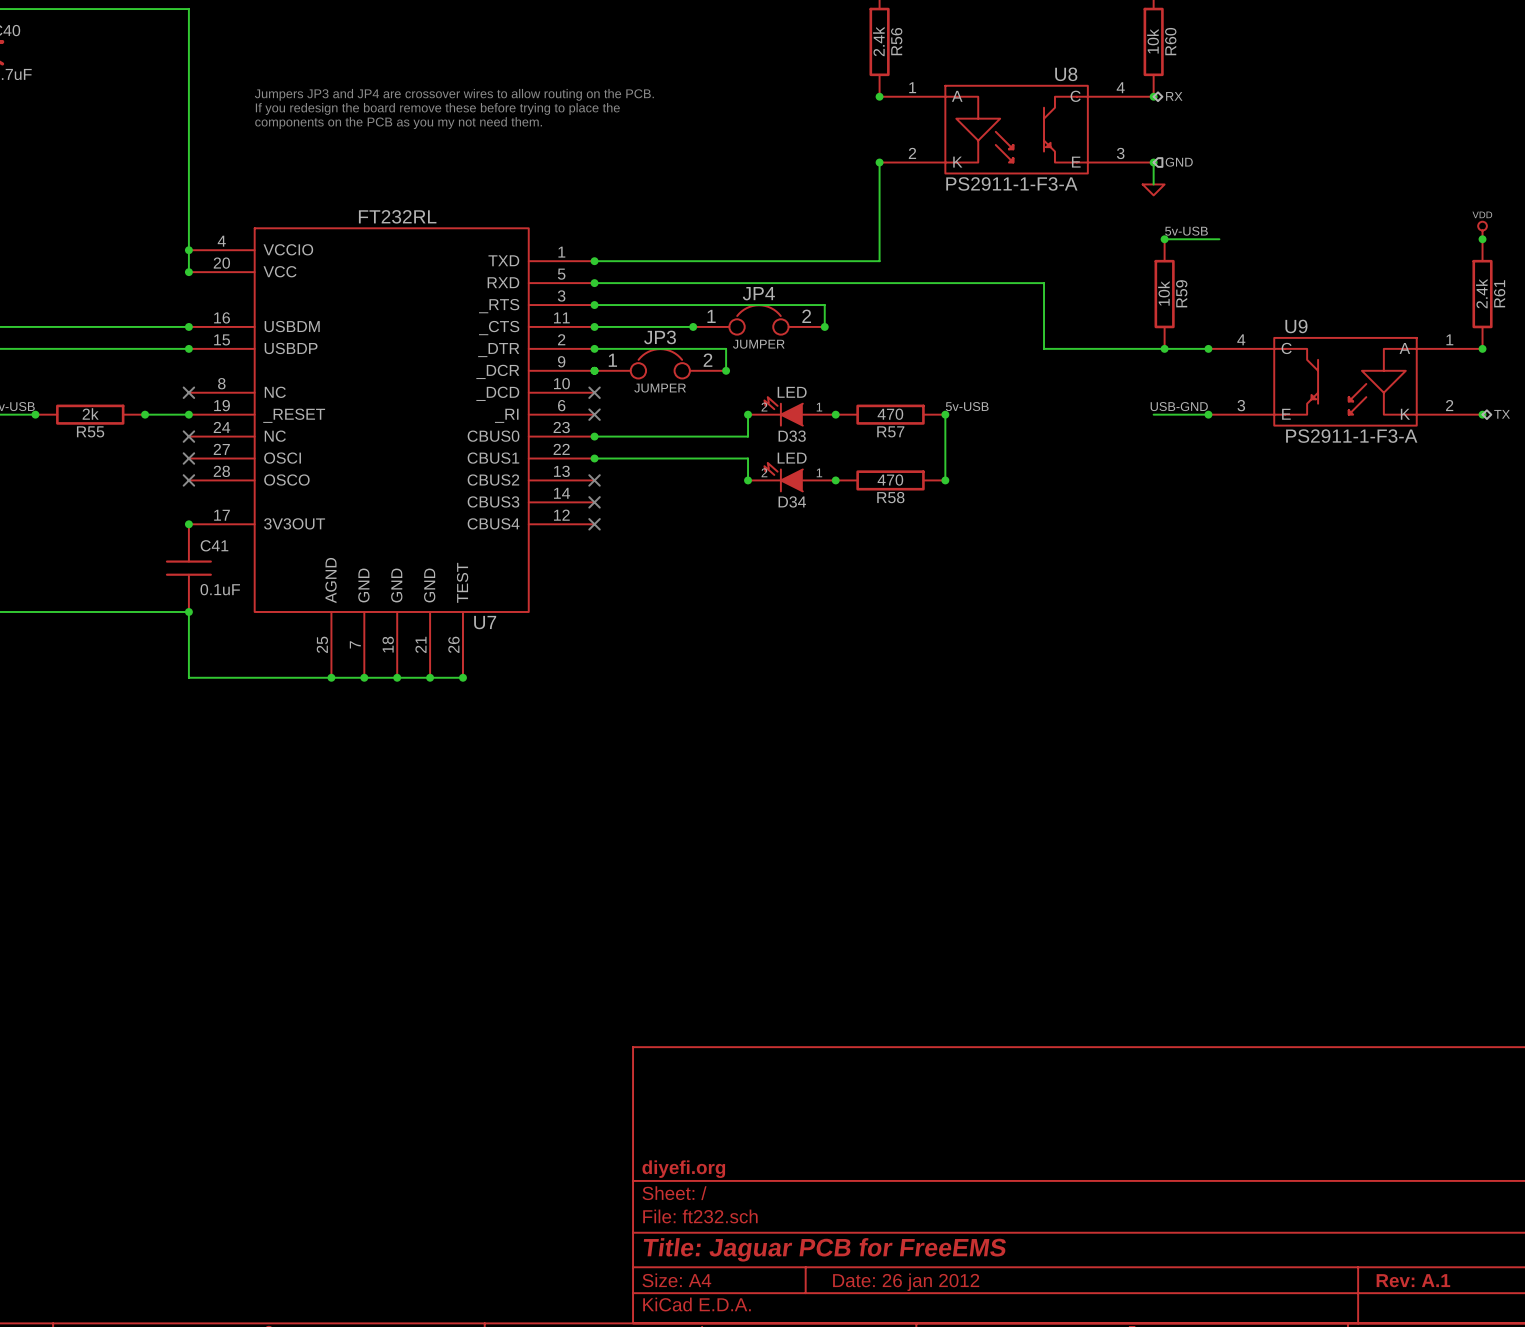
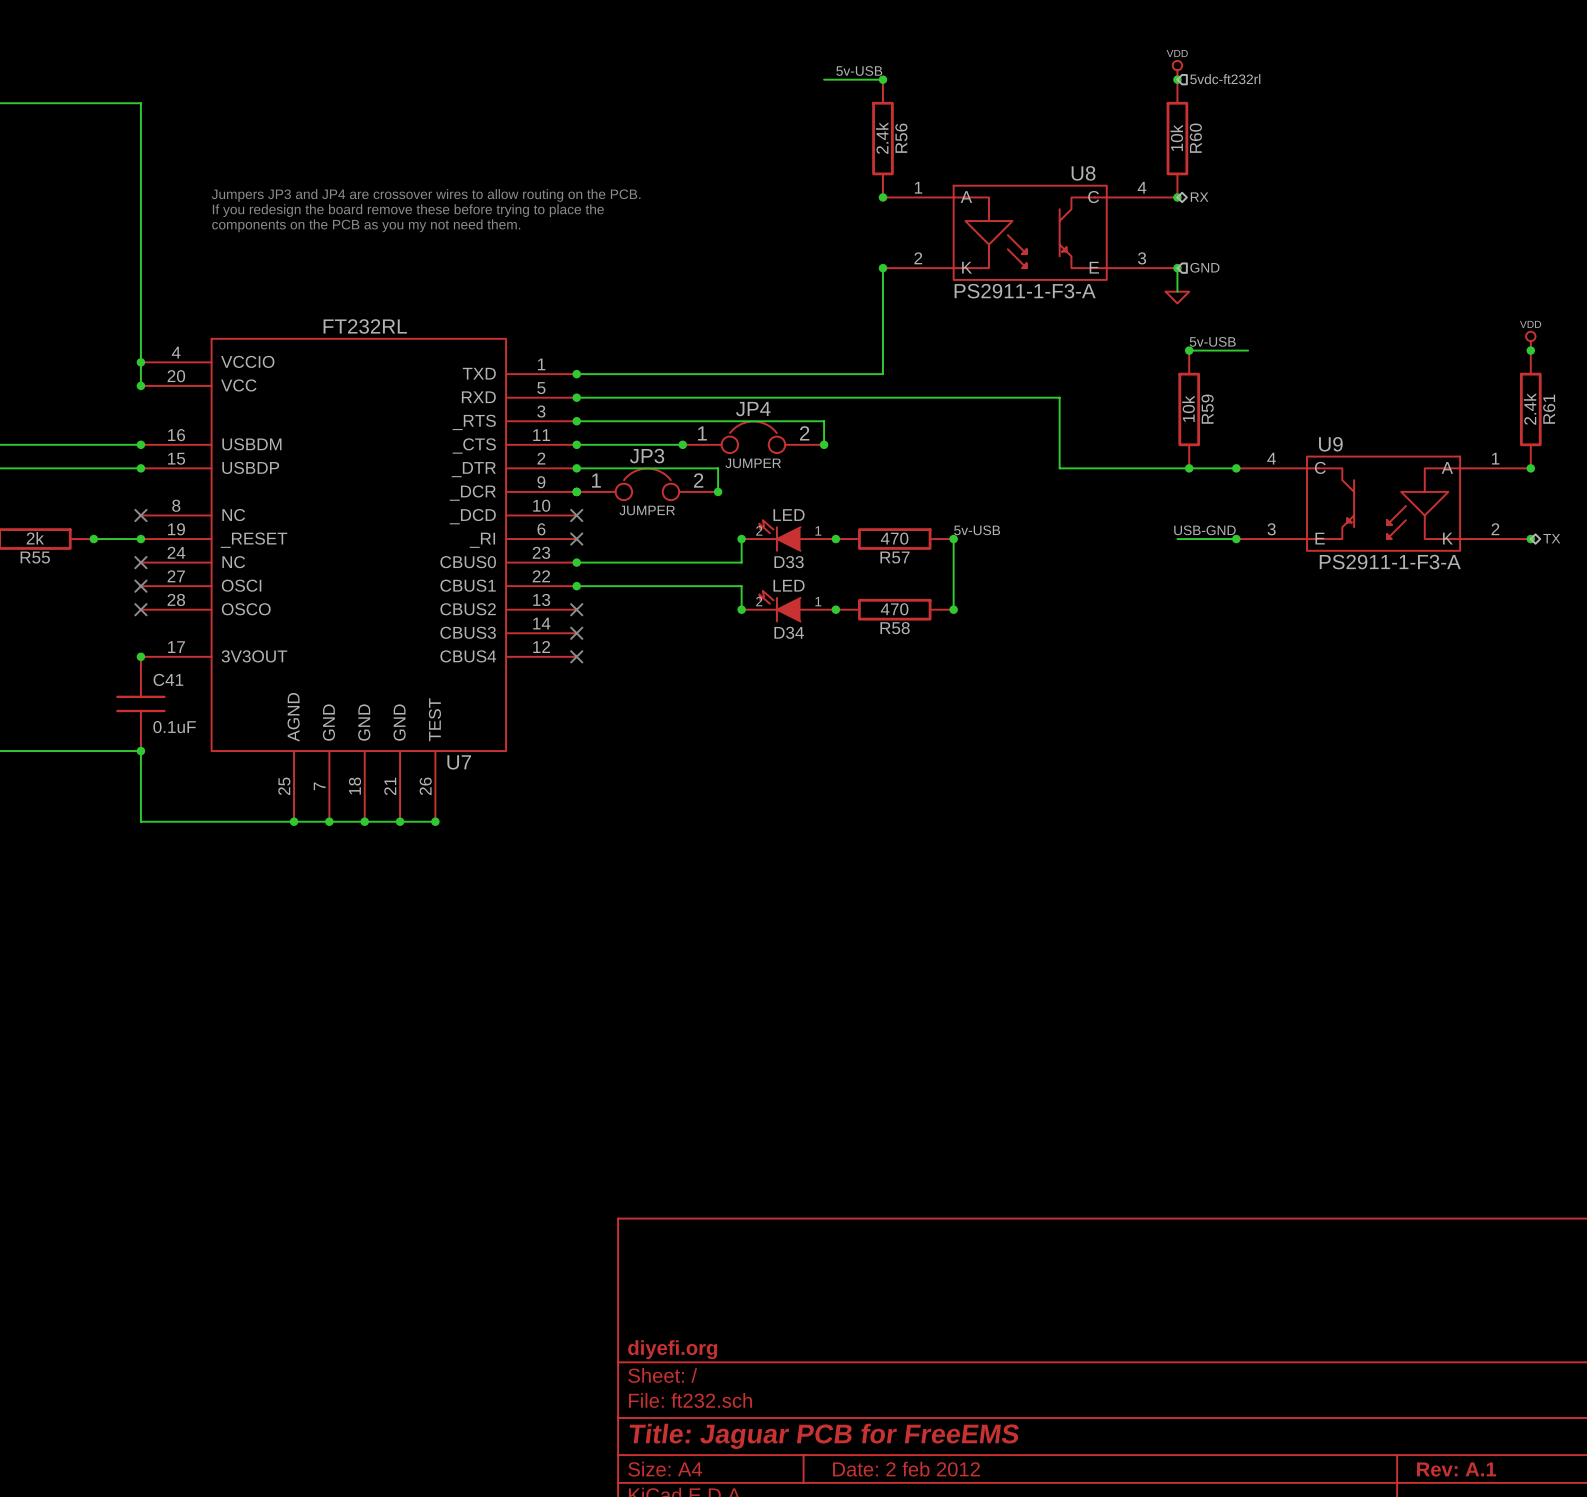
title block: Date: 26 jan 2012 (906, 1282) -> Date: 2 feb 2012 (906, 1469)

